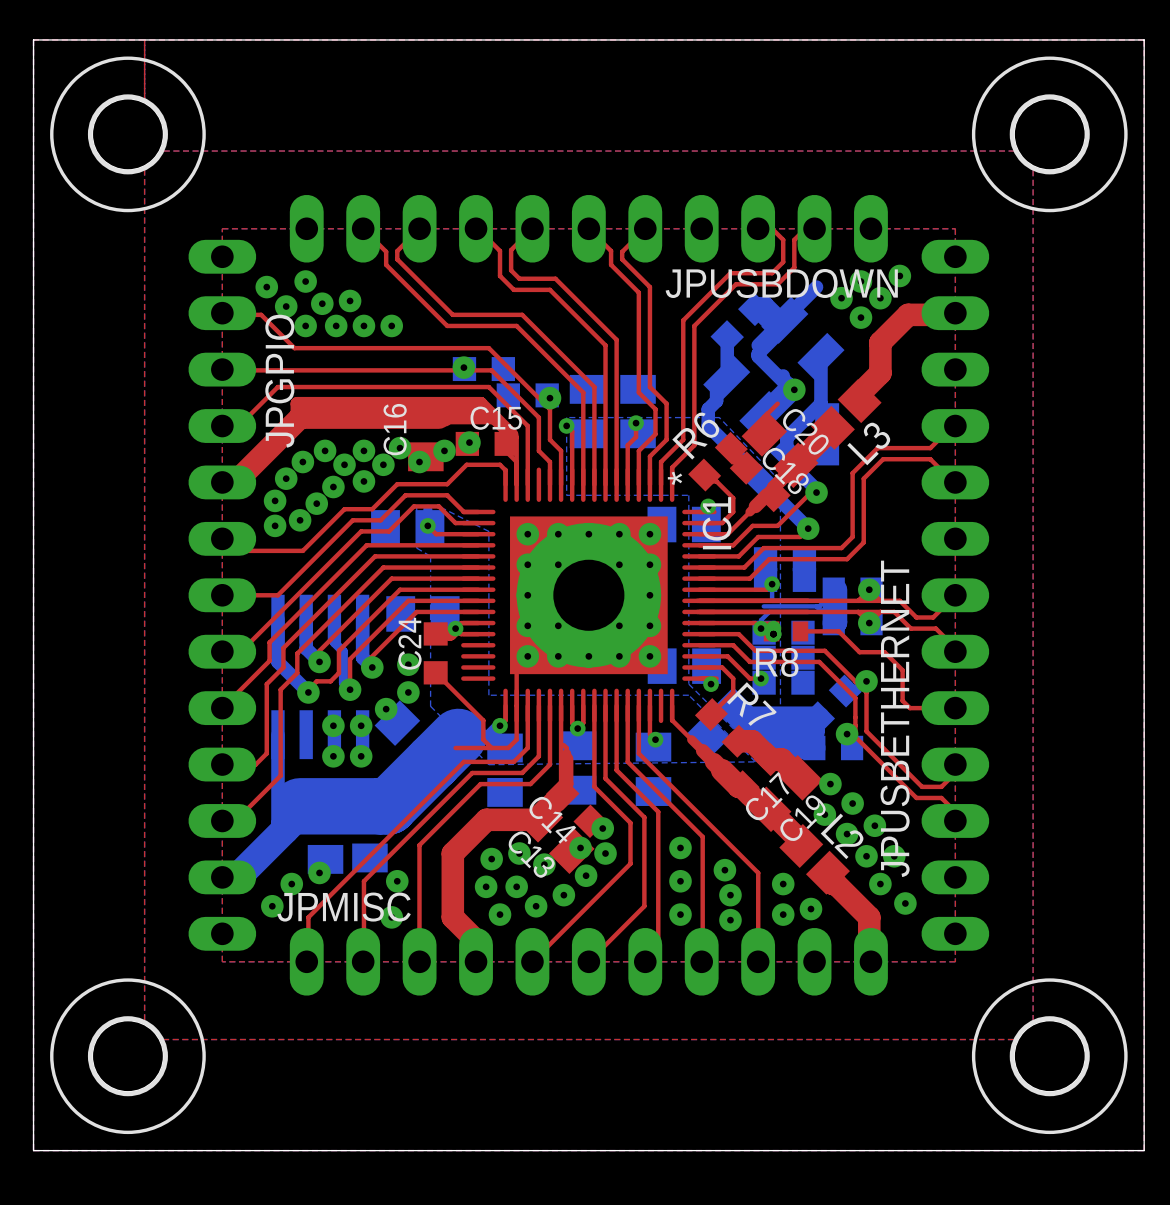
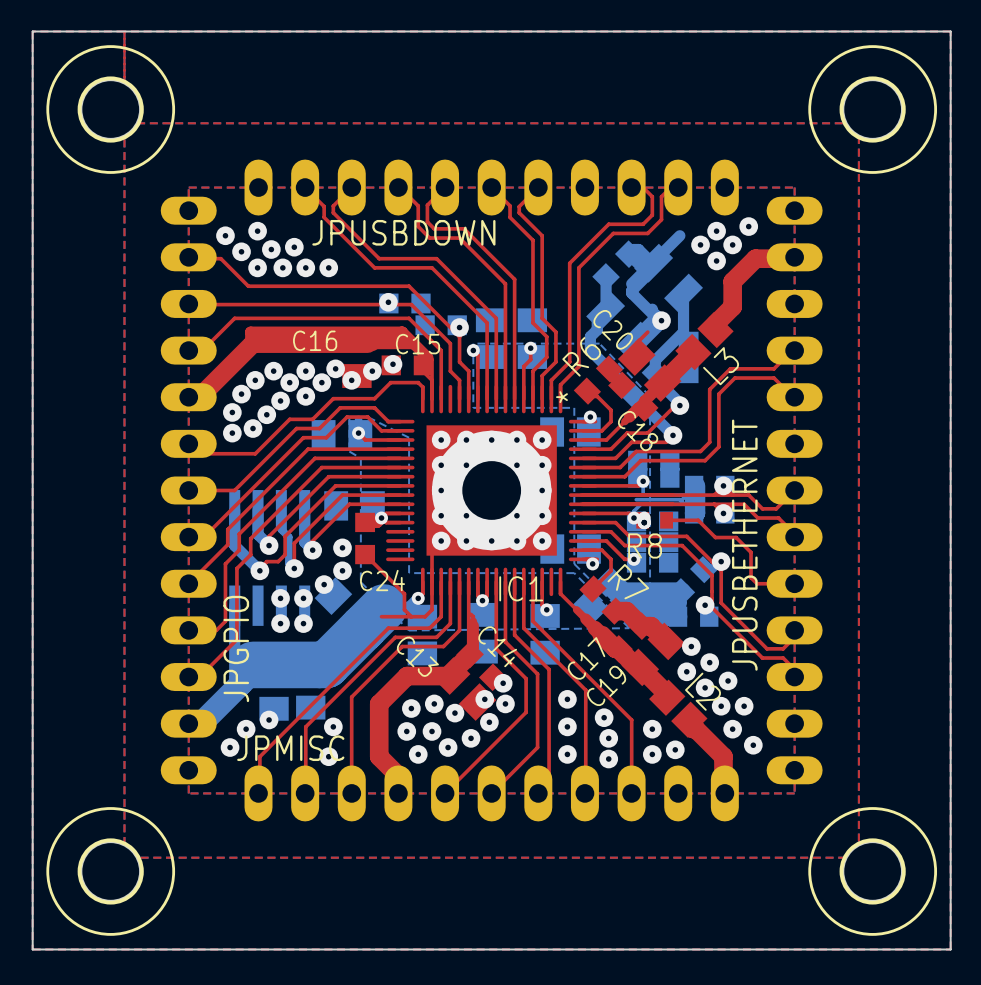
JPUSBDOWN name position: JPUSBDOWN (781, 283) -> JPUSBDOWN (403, 232)
JPGPIO name position: JPGPIO (279, 381) -> JPGPIO (236, 648)
C16 name rotation: 0° (395, 429) -> 90° clockwise (315, 340)
C20 name position: C20 (805, 432) -> C20 (613, 329)
C18 name position: C18 (785, 470) -> C18 (638, 431)
IC1 name rotation: 0° (717, 523) -> 90° clockwise (521, 588)
IC1 name position: IC1 (717, 523) -> IC1 (521, 588)
C24 name rotation: 0° (409, 643) -> 90° clockwise (382, 580)
C24 name position: C24 (409, 643) -> C24 (382, 580)
JPUSBETHERNET name position: JPUSBETHERNET (895, 718) -> JPUSBETHERNET (744, 545)
C17 name position: C17 (767, 796) -> C17 (586, 658)
C19 name position: C19 (803, 818) -> C19 (606, 685)
C14 name position: C14 (552, 820) -> C14 (497, 646)
C13 name position: C13 (531, 854) -> C13 (417, 656)

